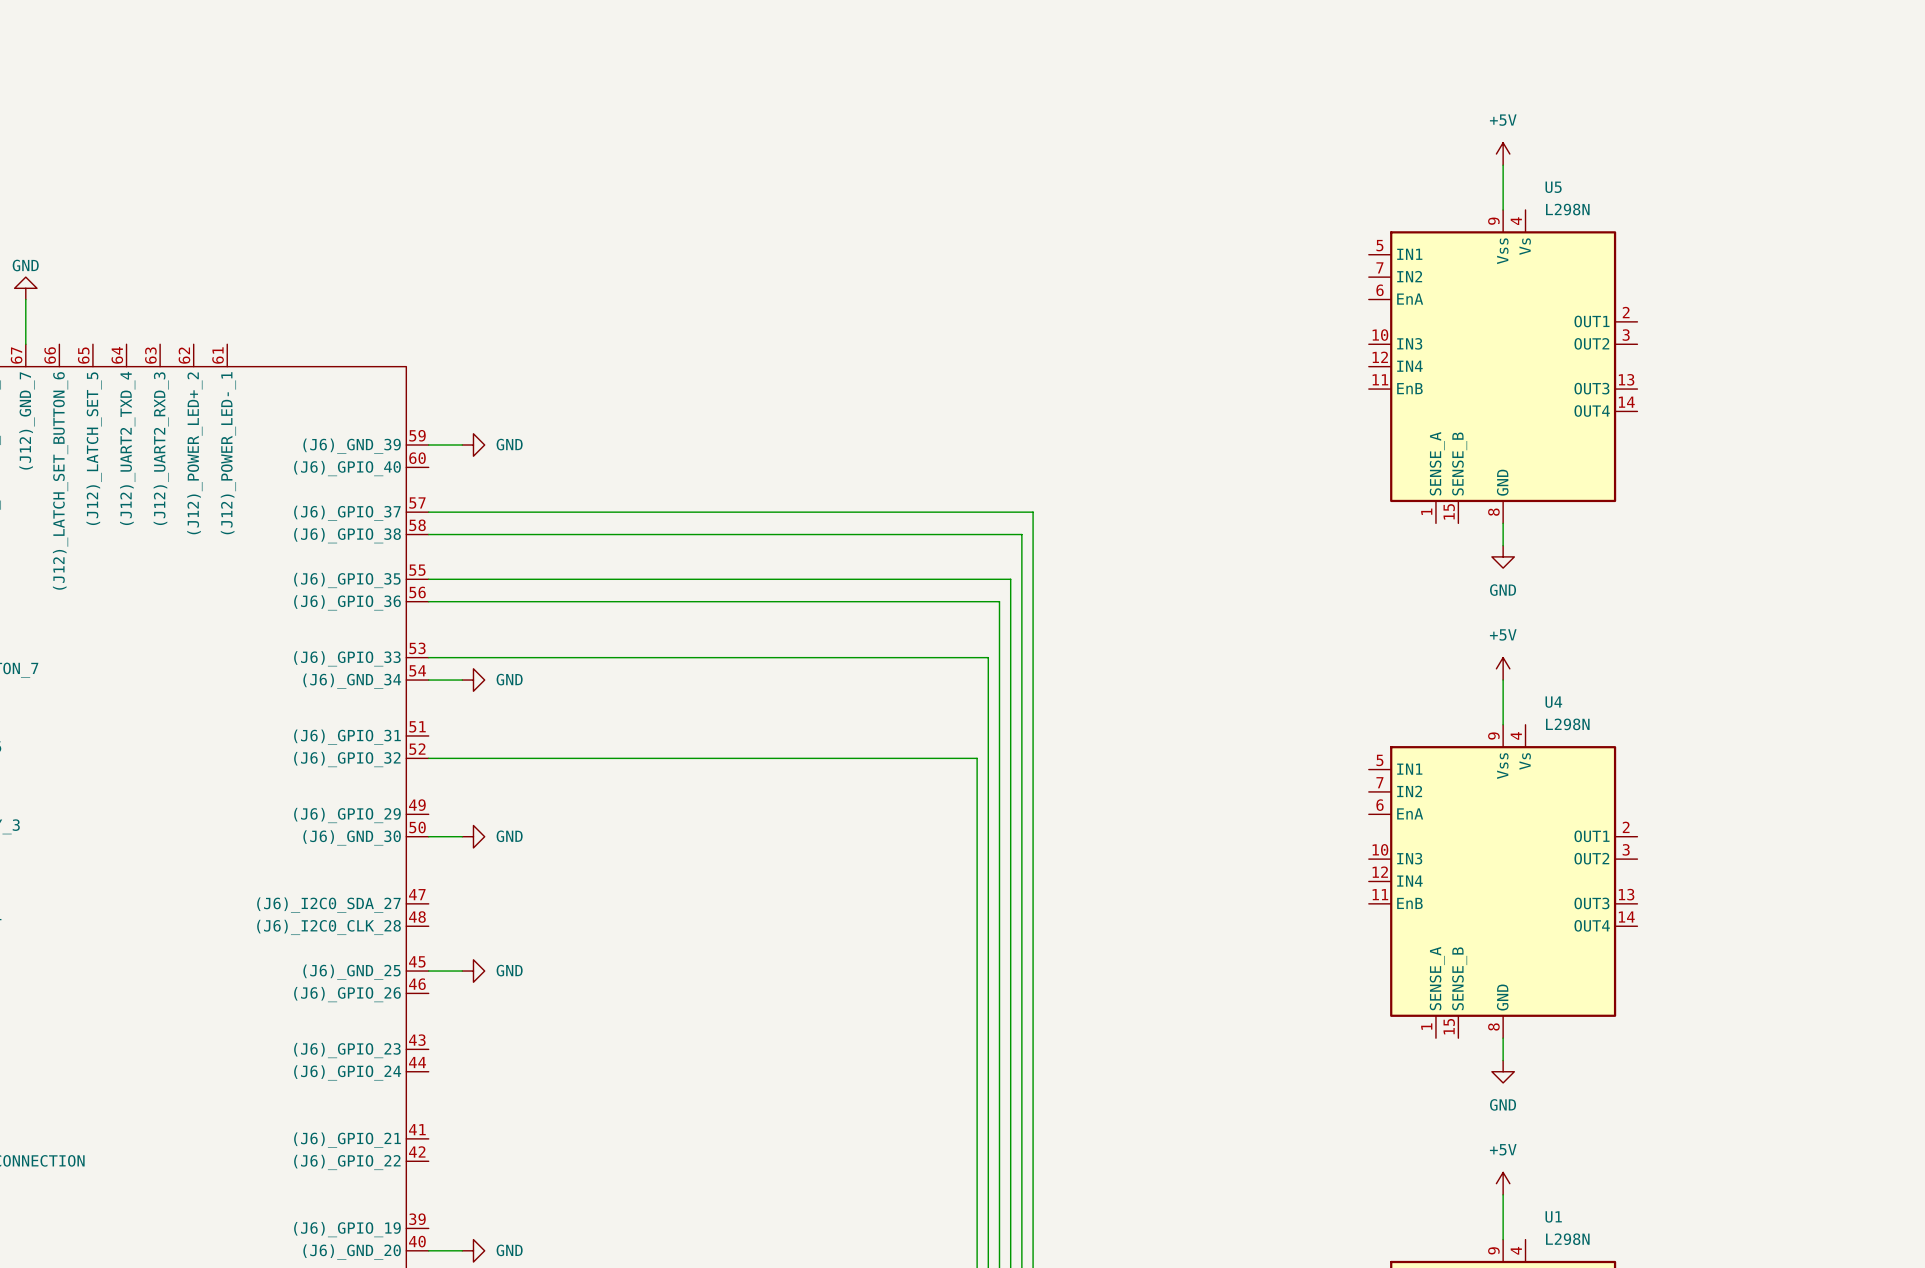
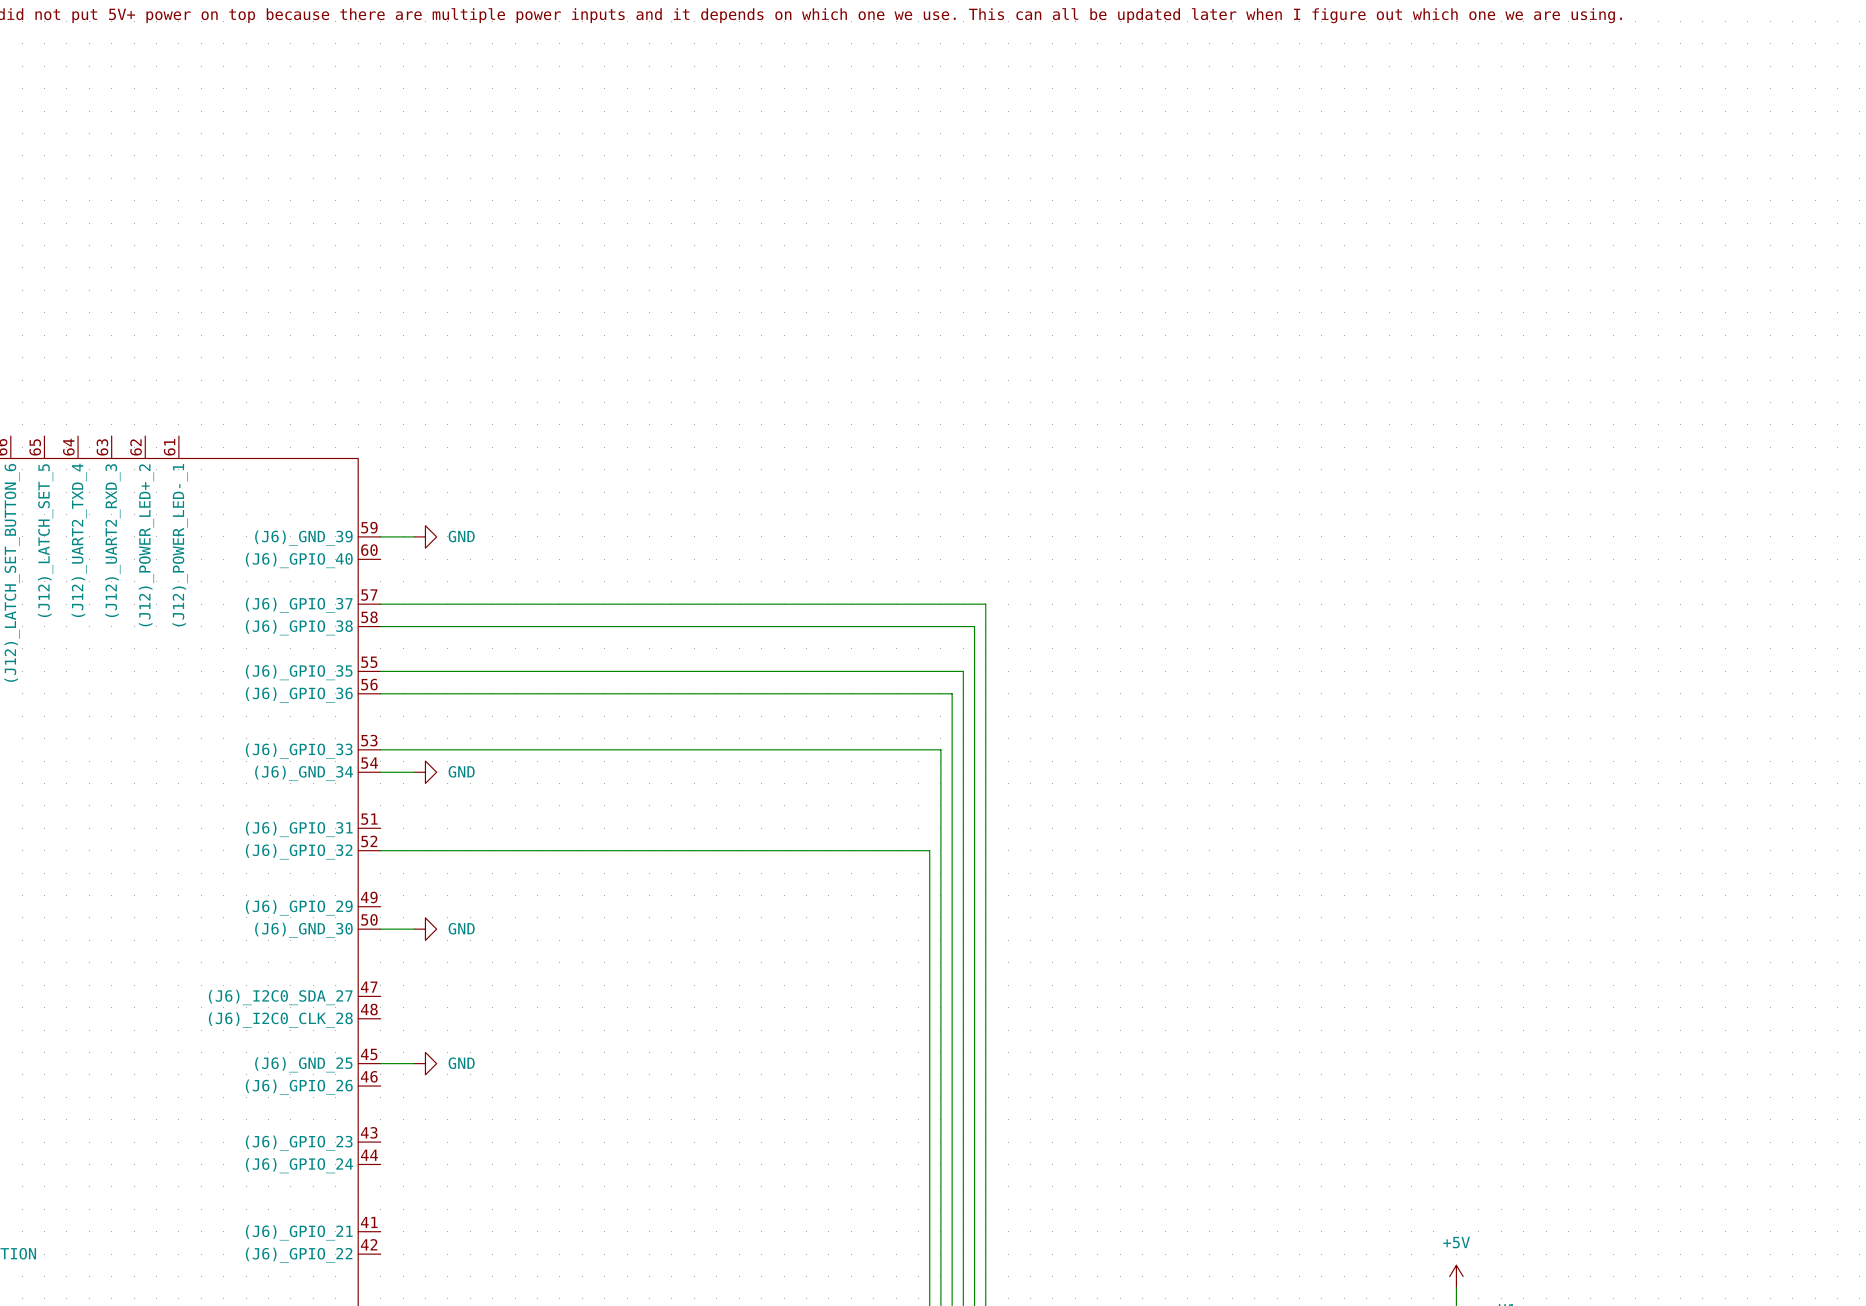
power symbol: +5V (1503, 154) -> none
wire: (1503, 165) (1503, 209) -> none
U5: L298N (1503, 366) -> none
wire: (1503, 523) (1503, 545) -> none
power symbol: GND (1503, 556) -> none
power symbol: +5V (1503, 668) -> none
wire: (1503, 680) (1503, 724) -> none
U4: L298N (1503, 881) -> none
wire: (1503, 1038) (1503, 1060) -> none
power symbol: GND (1503, 1071) -> none

